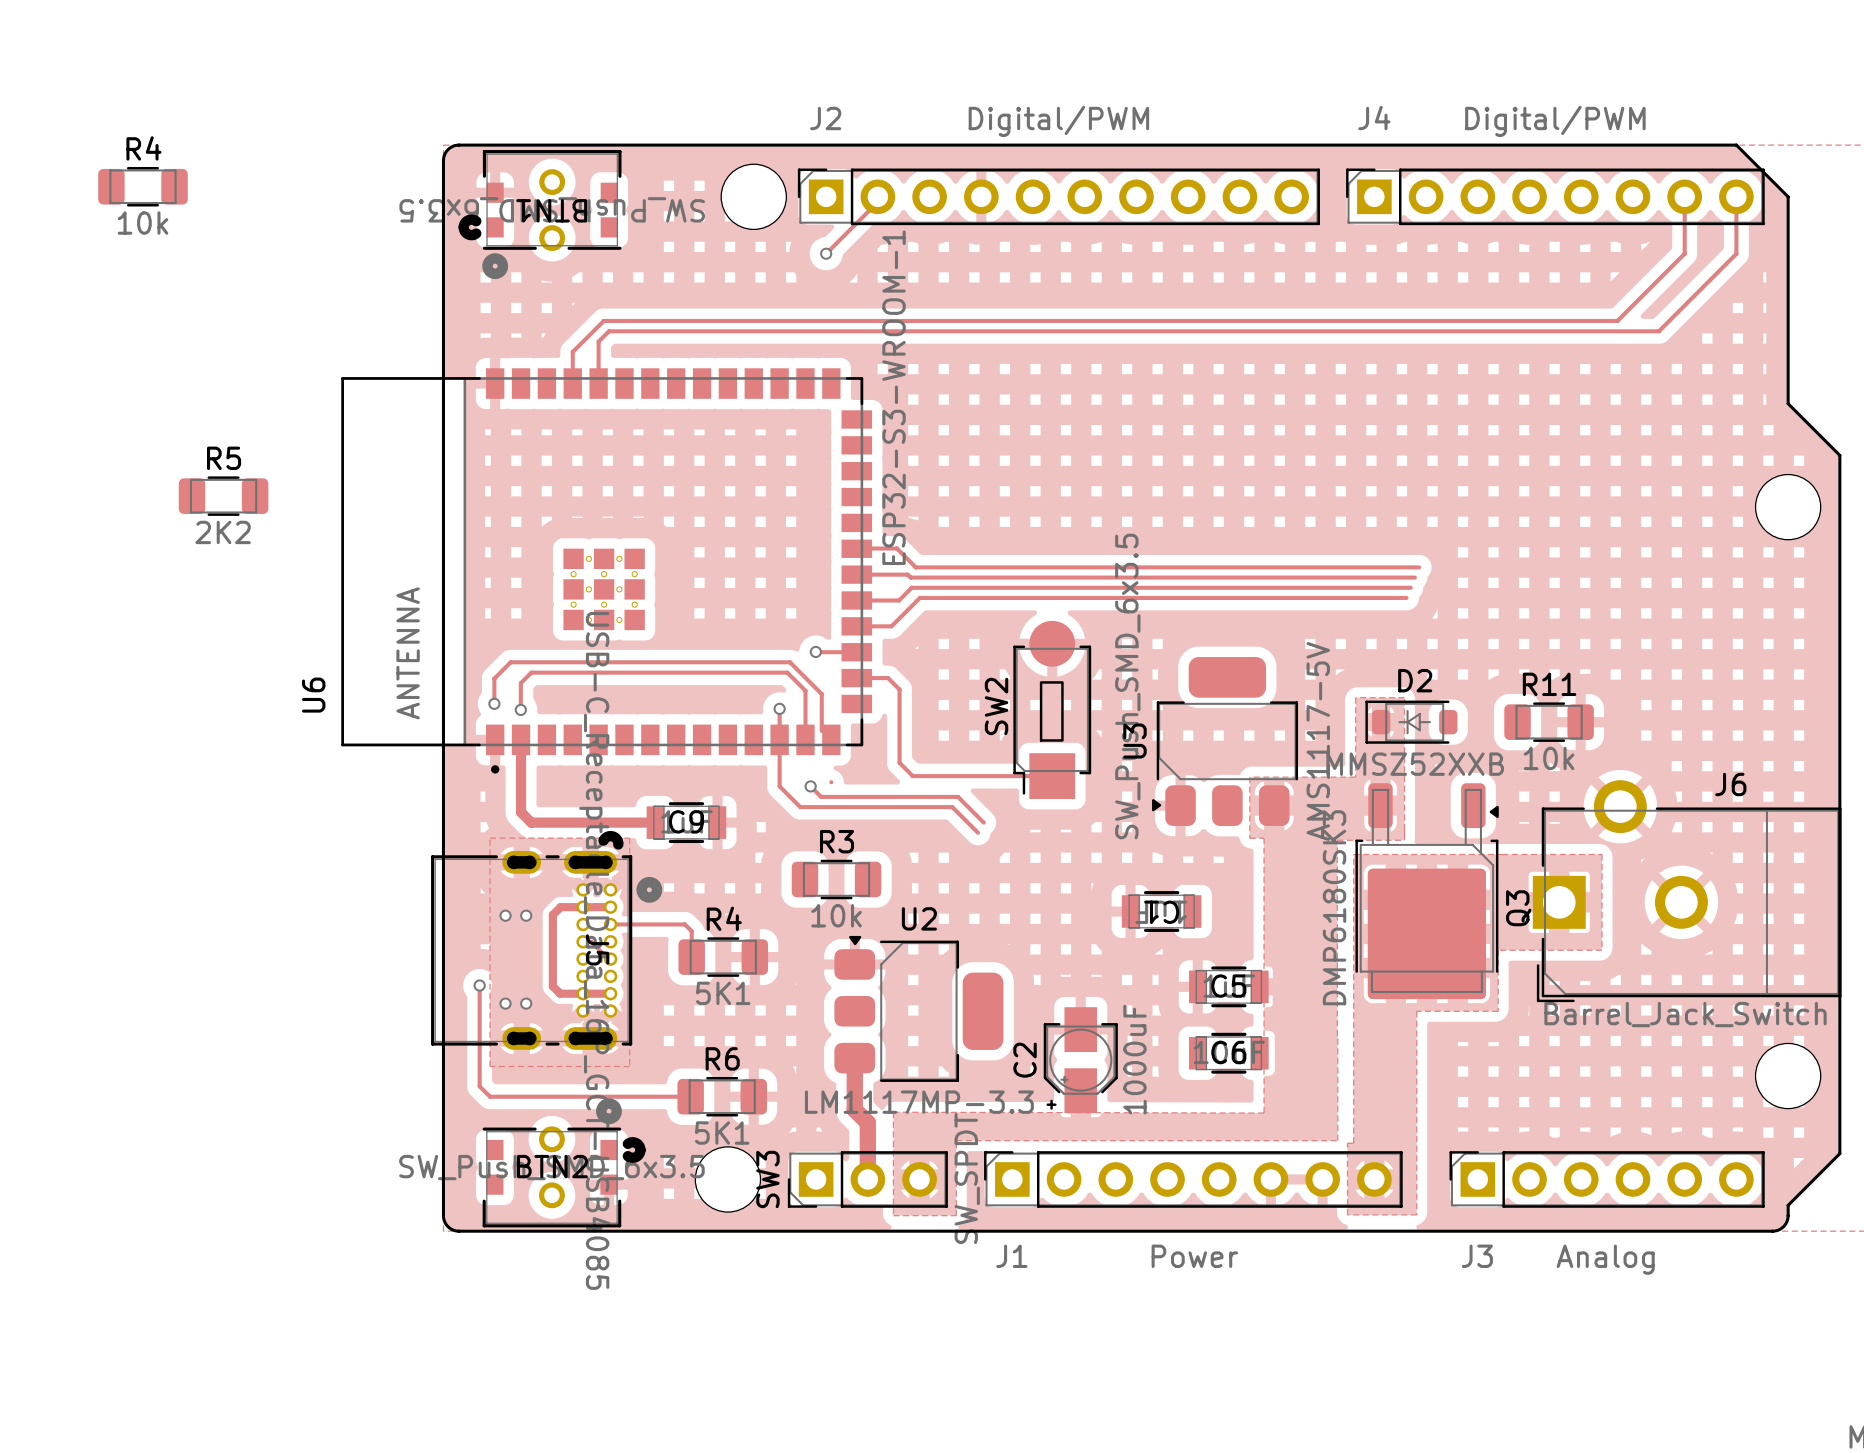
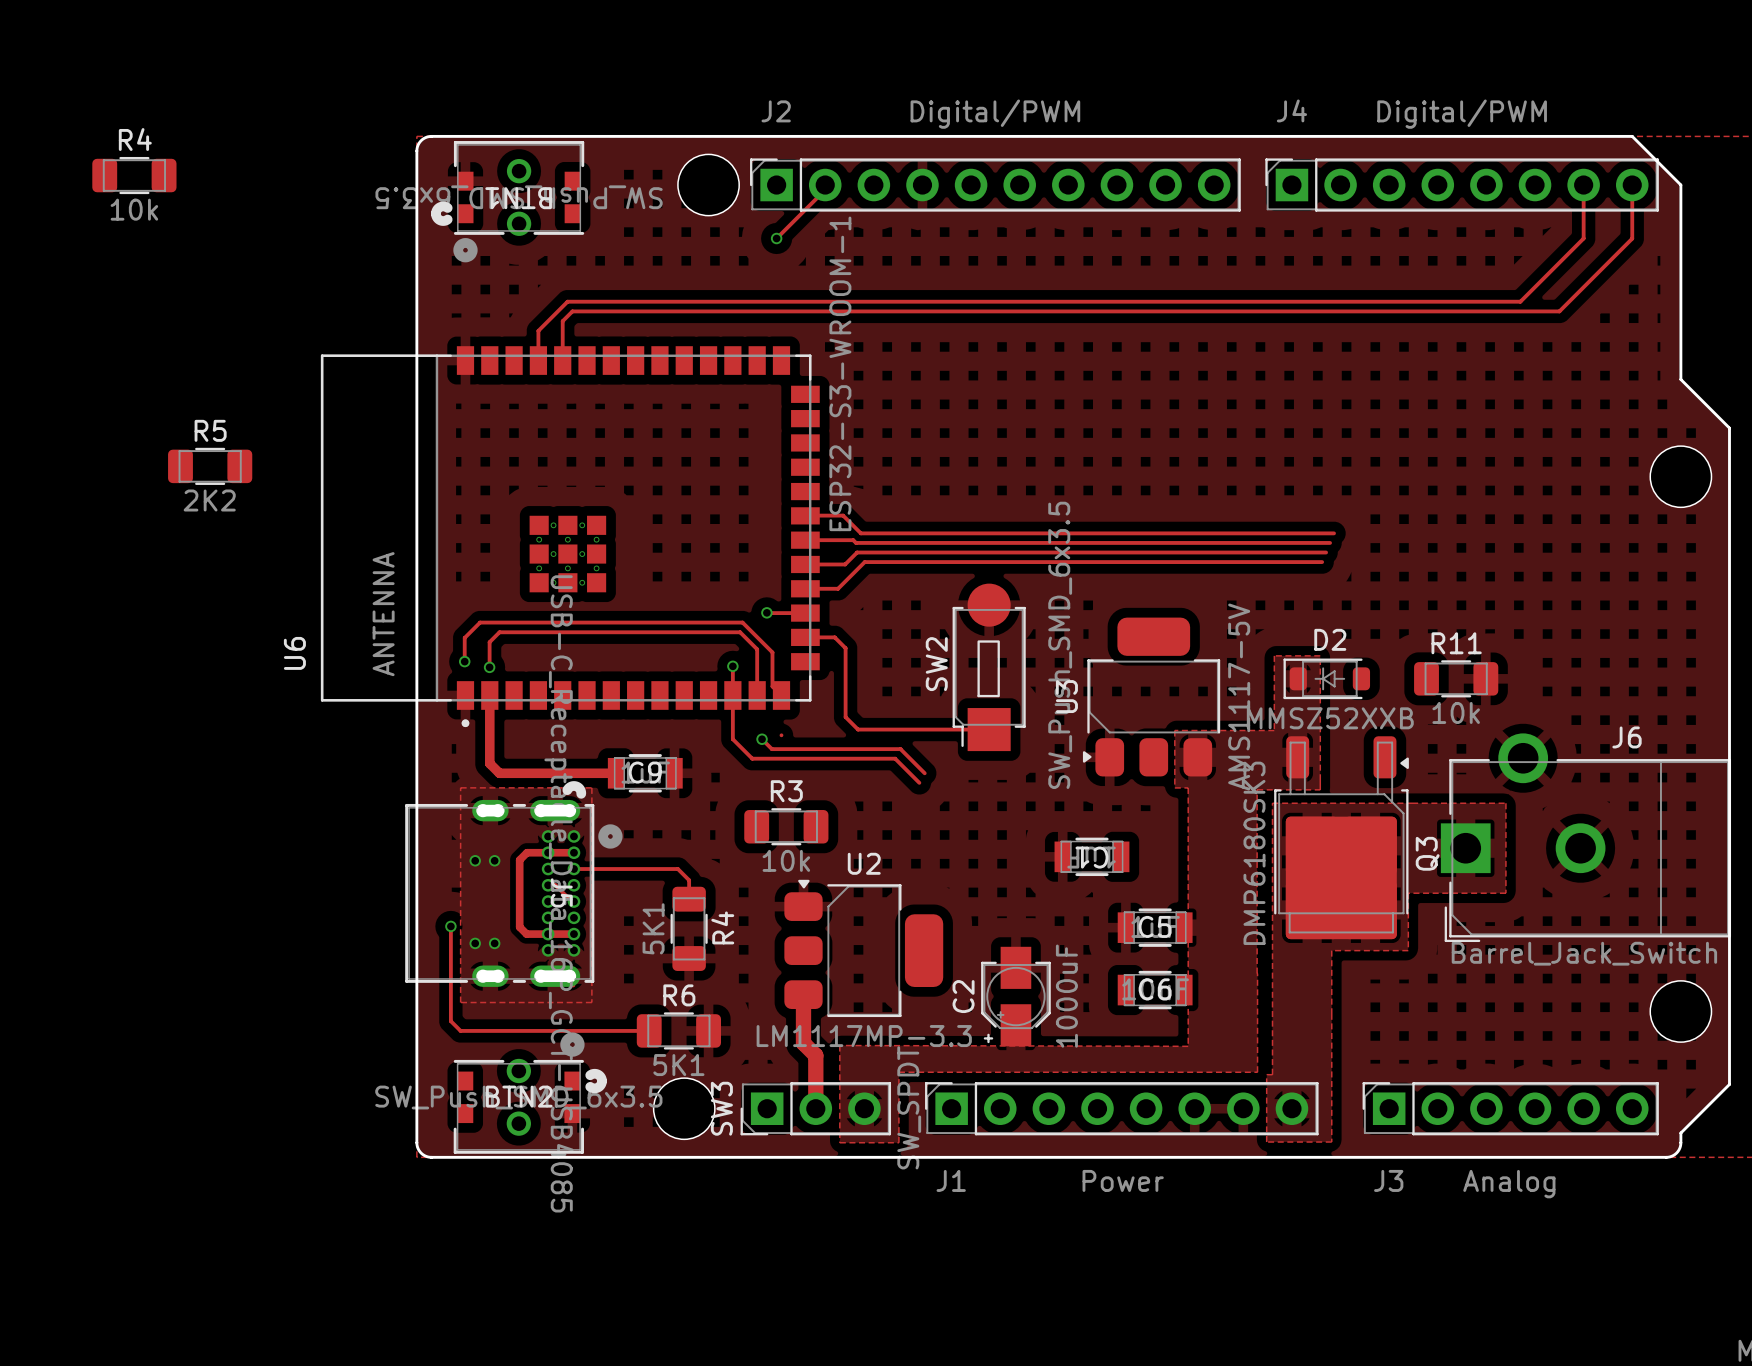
track: (684, 924) (691, 931) (691, 957) -> (643, 869) (677, 869) (689, 880) (688, 899)
R4 rotation: 0° (723, 957) -> 90° clockwise (689, 928)

